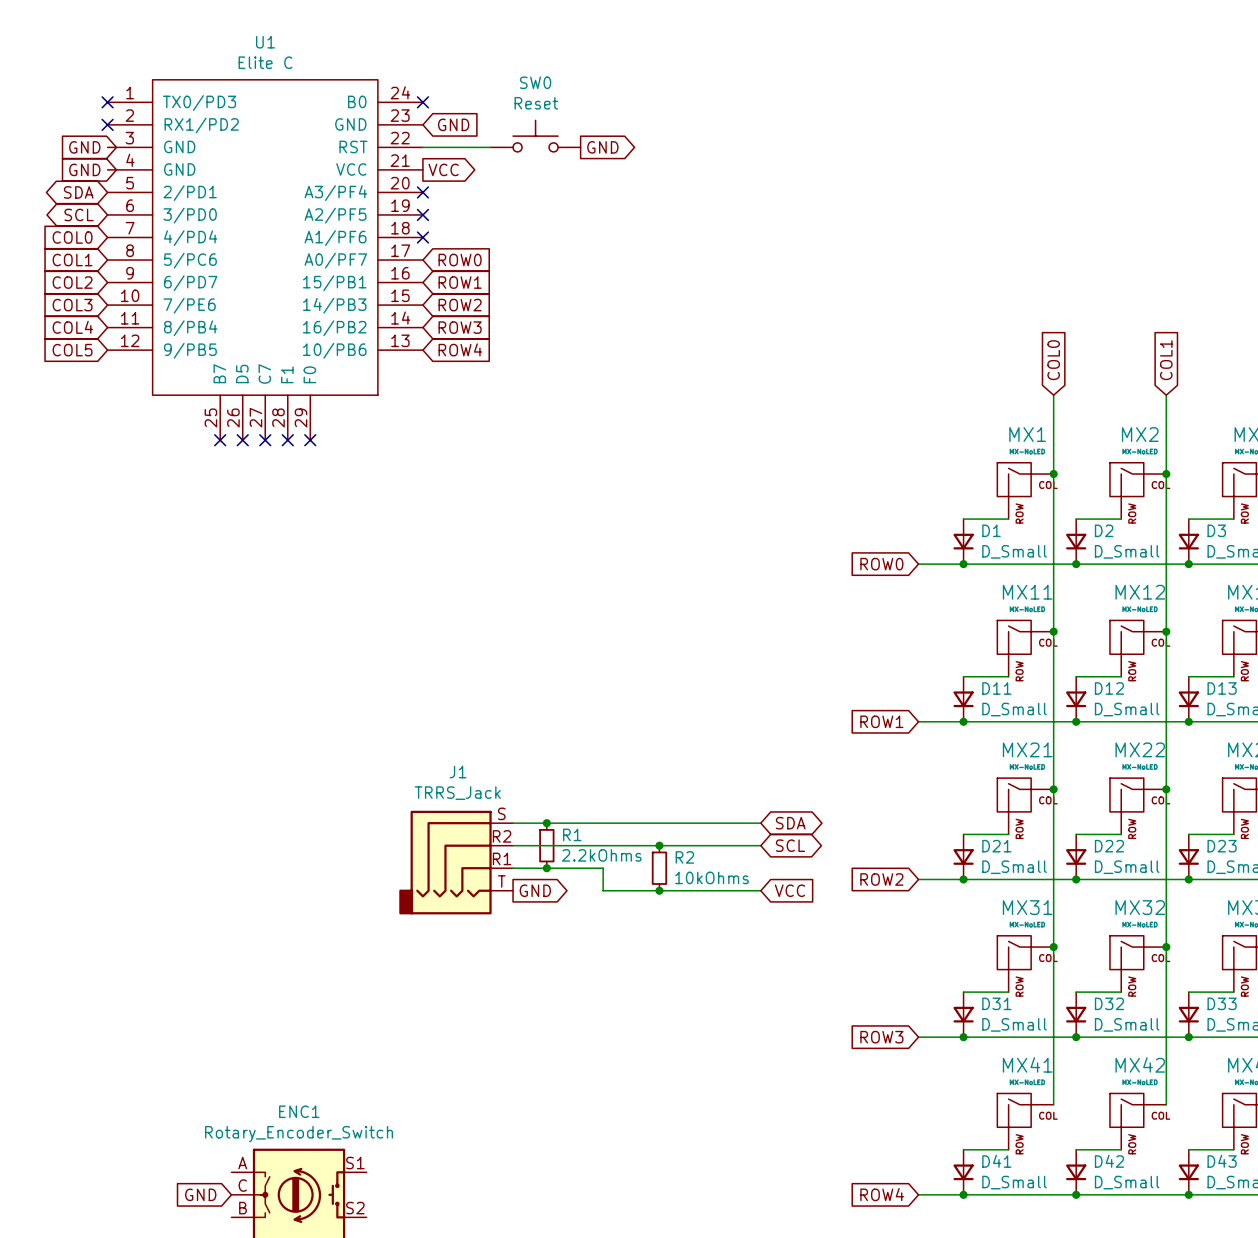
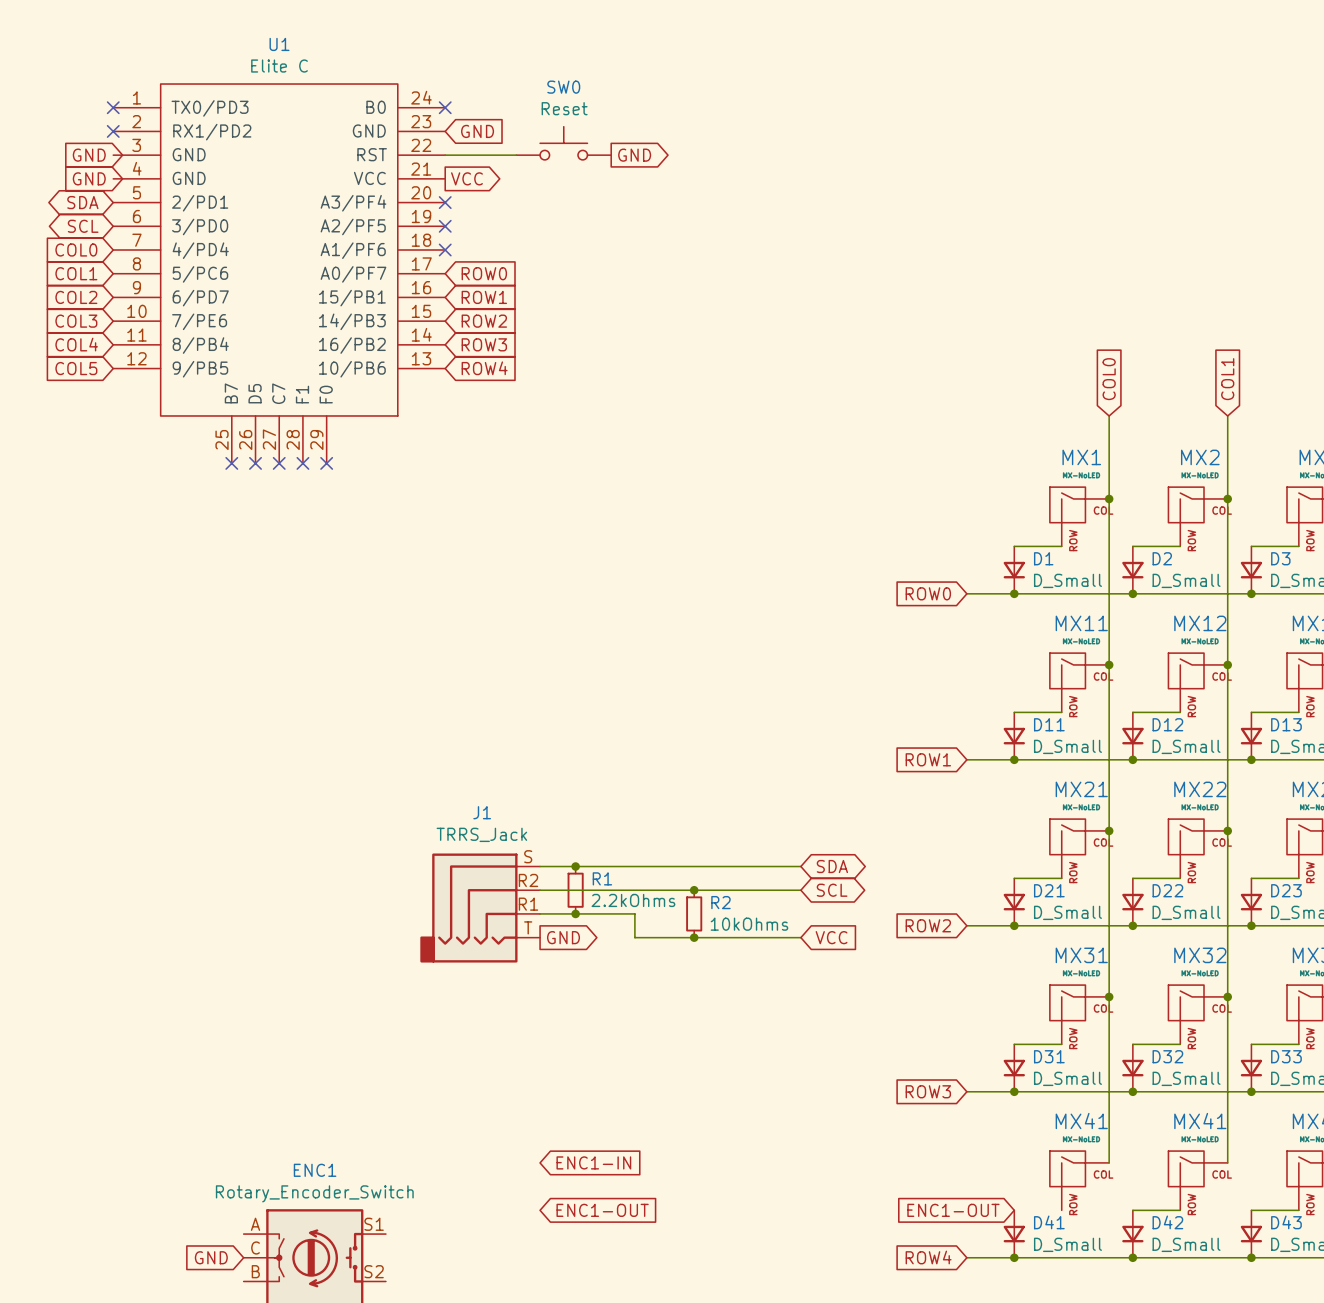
MX42 name: MX42 (1140, 1064) -> MX41 (1200, 1121)
global label: none -> ENC1-IN (593, 1162)
global label: none -> ENC1-OUT (602, 1210)
global label: none -> ENC1-OUT (953, 1210)
wire: (963, 1149) (1008, 1149) -> none

